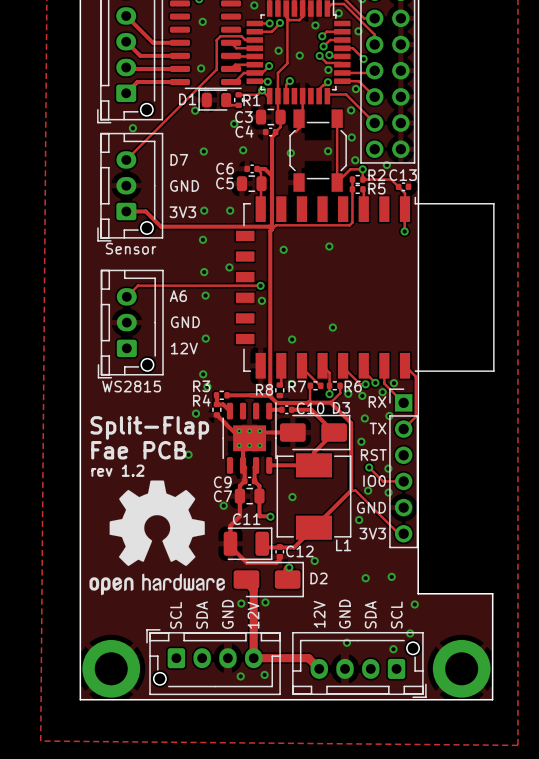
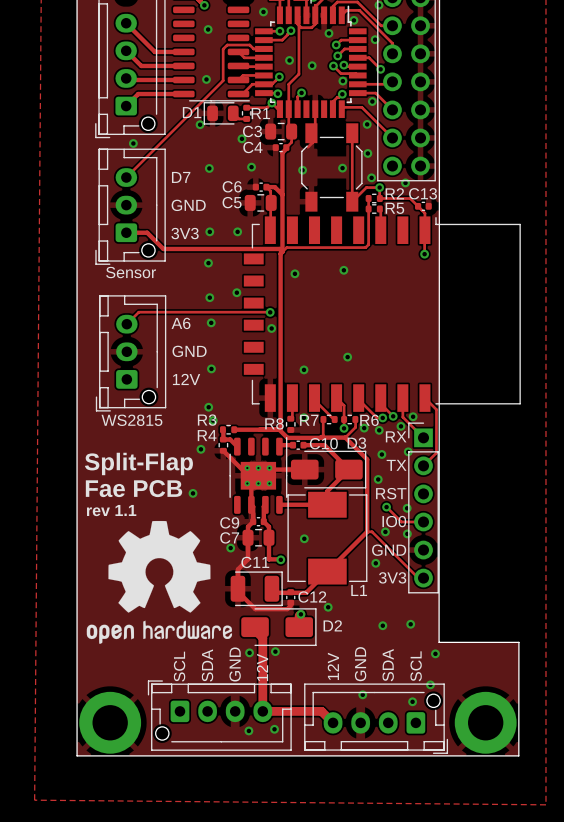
text: rev 1.2 (117, 470) -> rev 1.1 (111, 510)

